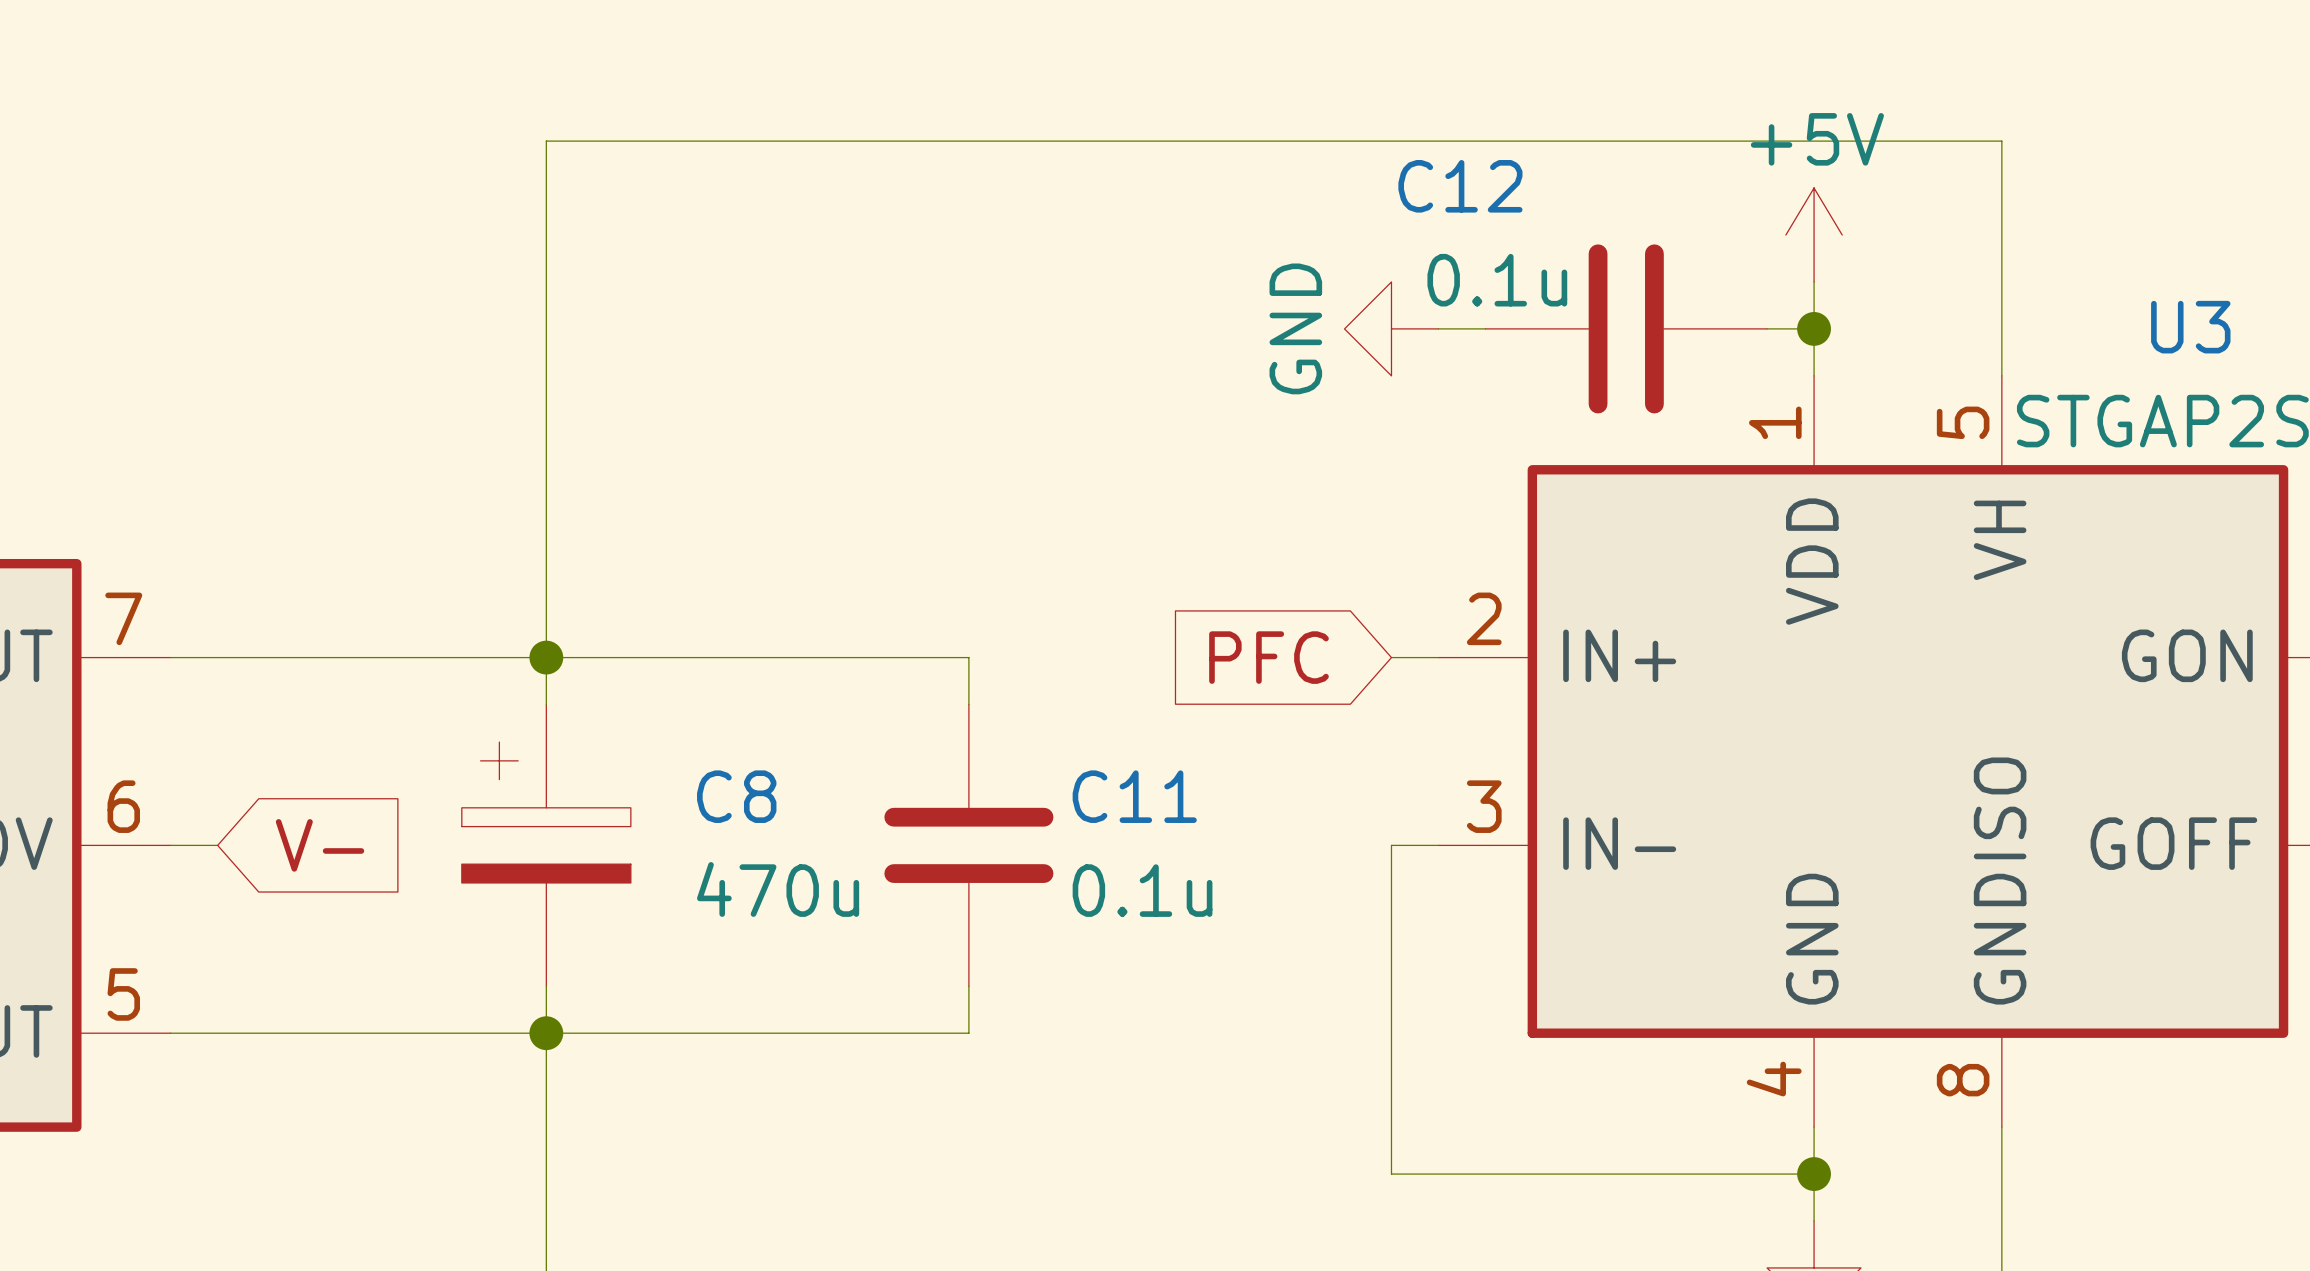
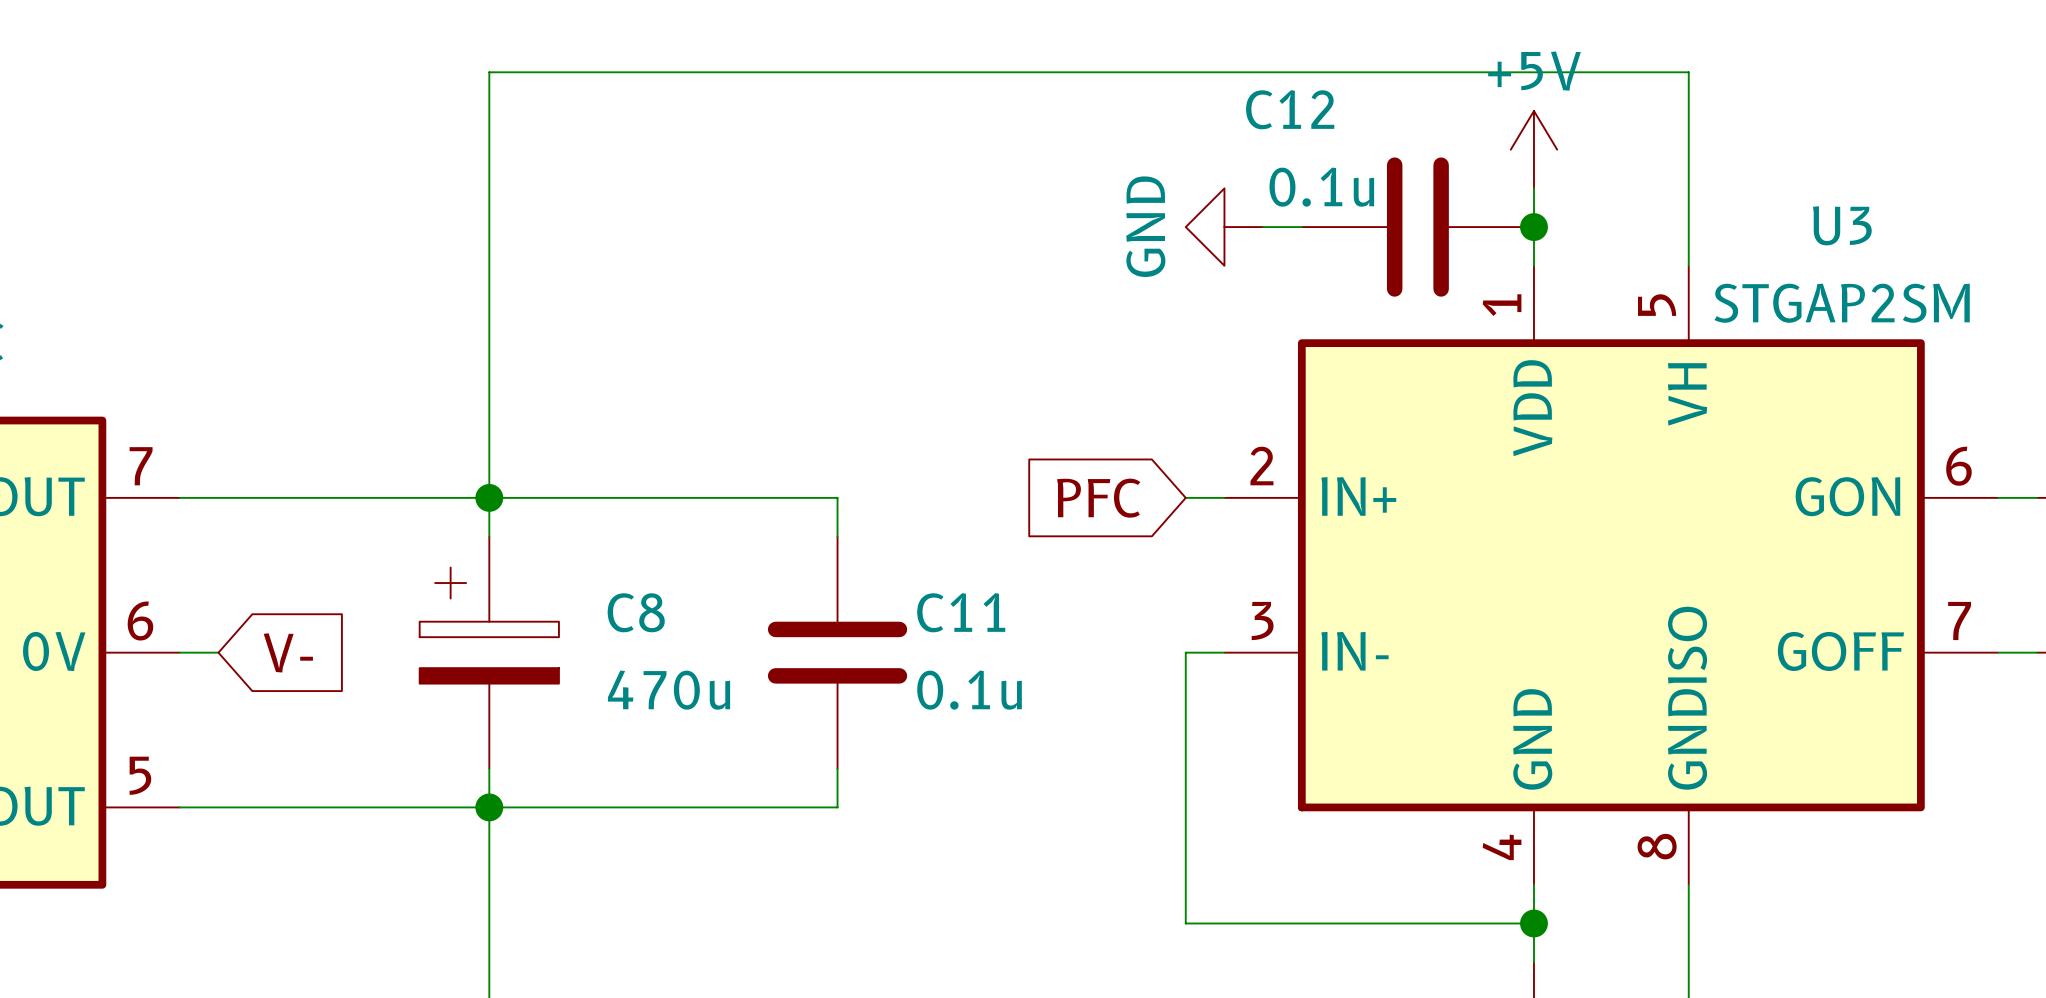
power symbol position: GND (1391, 328) -> GND (1224, 227)
C12 position: (1626, 328) -> (1417, 227)

